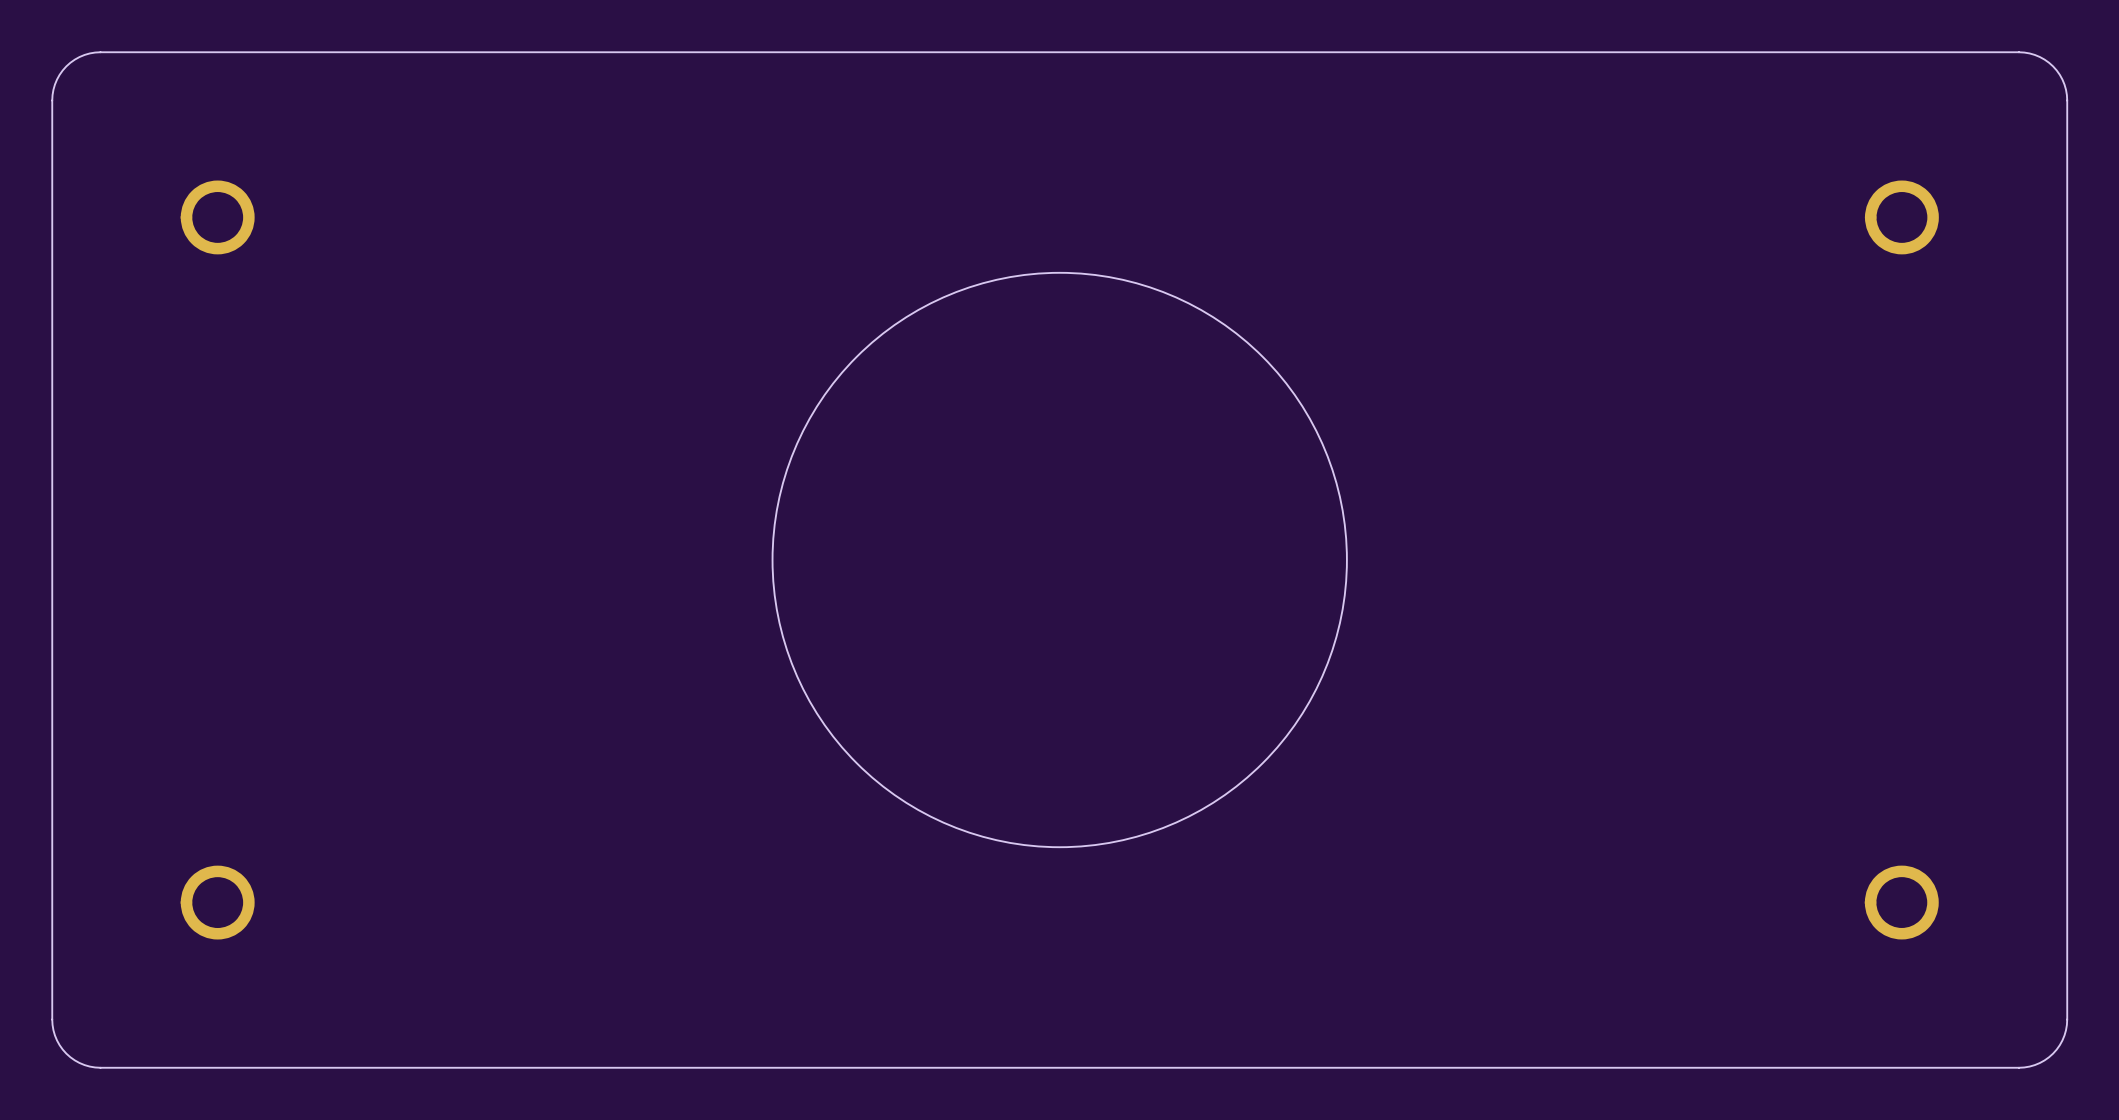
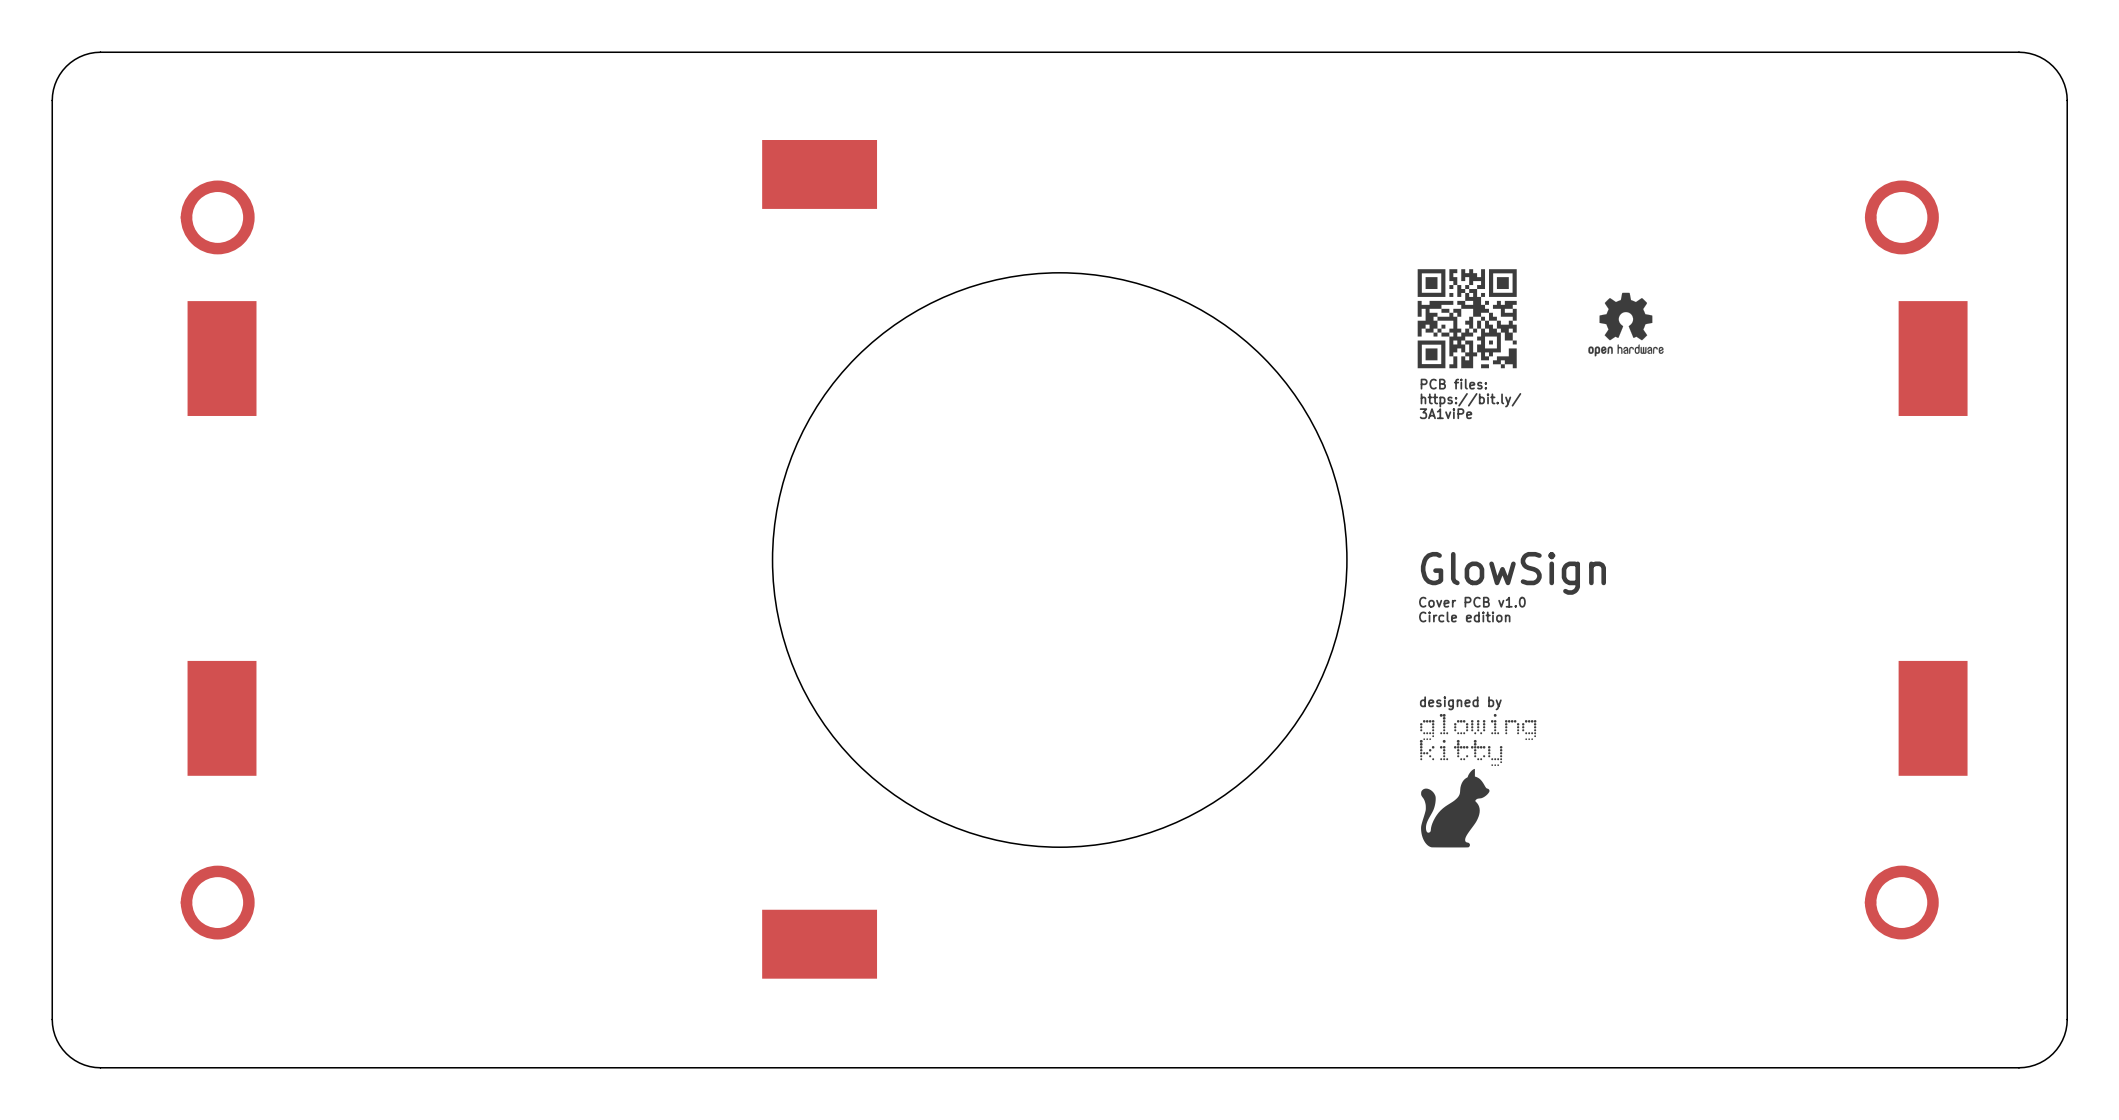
part: none -> (819, 174)
drawing: none -> [1417, 269, 1517, 369]
drawing: none -> [1588, 292, 1664, 357]
part: none -> (222, 358)
part: none -> (1933, 358)
text: none -> PCB files: (1453, 384)
text: none -> https://bit.ly/ (1470, 400)
text: none -> 3A1viPe (1446, 413)
text: none -> GlowSign (1513, 573)
text: none -> Cover PCB v1.0 (1472, 602)
text: none -> Circle edition (1464, 616)
text: none -> designed by (1460, 703)
drawing: none -> [1419, 713, 1537, 848]
part: none -> (222, 718)
part: none -> (1933, 718)
part: none -> (819, 944)

